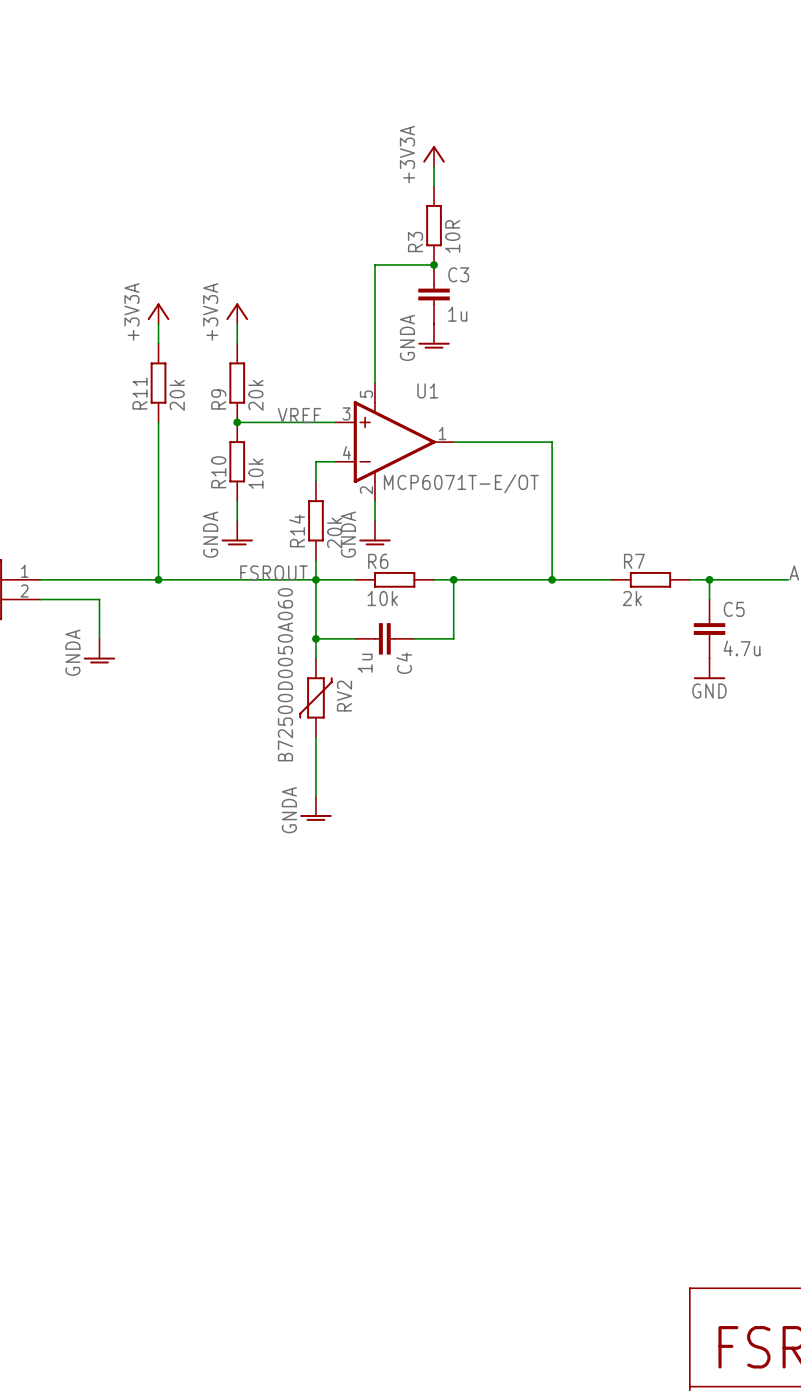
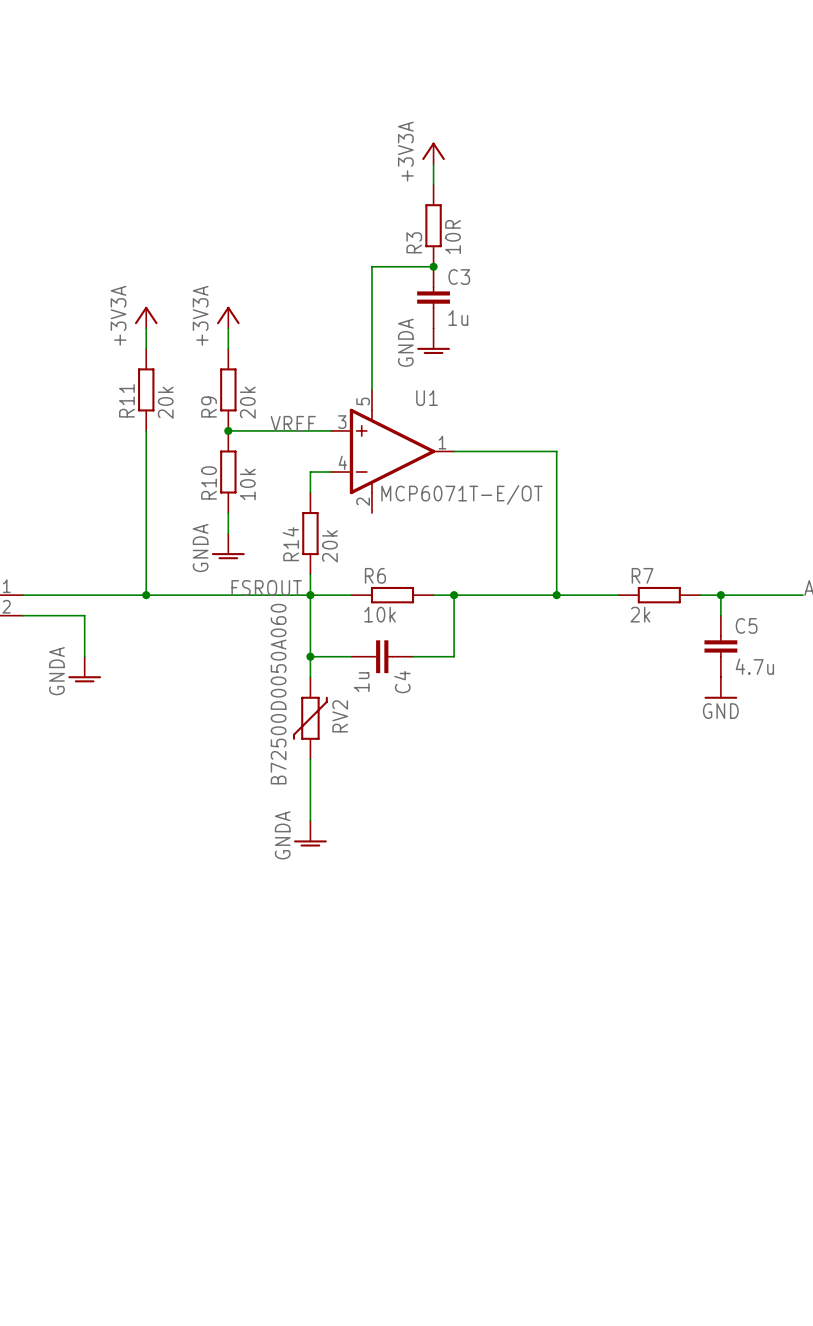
wire: (374, 501) (374, 520) -> none
power symbol: GNDA (374, 533) -> none

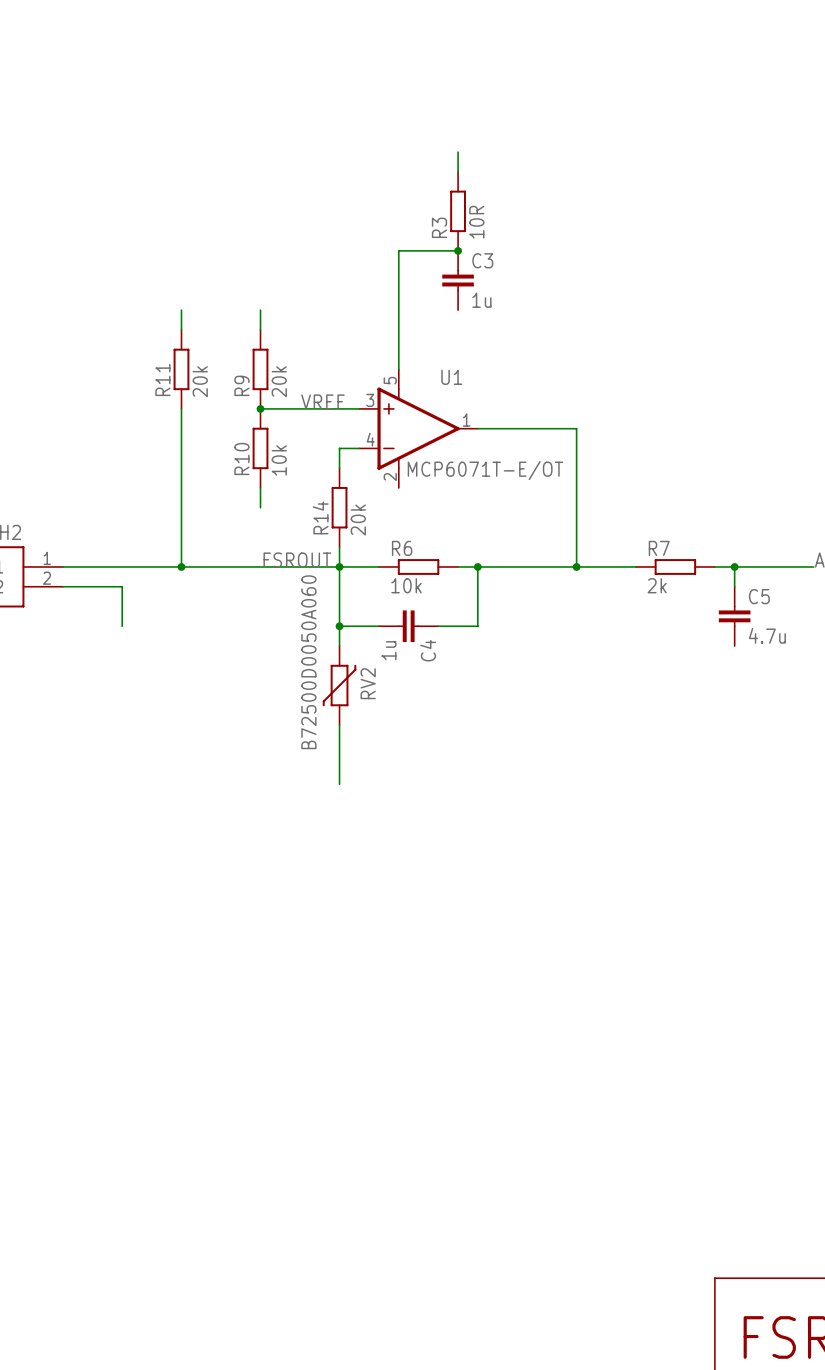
power symbol: +3V3A (433, 153) -> none
power symbol: +3V3A (146, 317) -> none
power symbol: +3V3A (228, 317) -> none
power symbol: GNDA (433, 341) -> none
power symbol: GNDA (228, 546) -> none
power symbol: GNDA (84, 669) -> none
power symbol: GND (720, 688) -> none
power symbol: GNDA (310, 833) -> none

